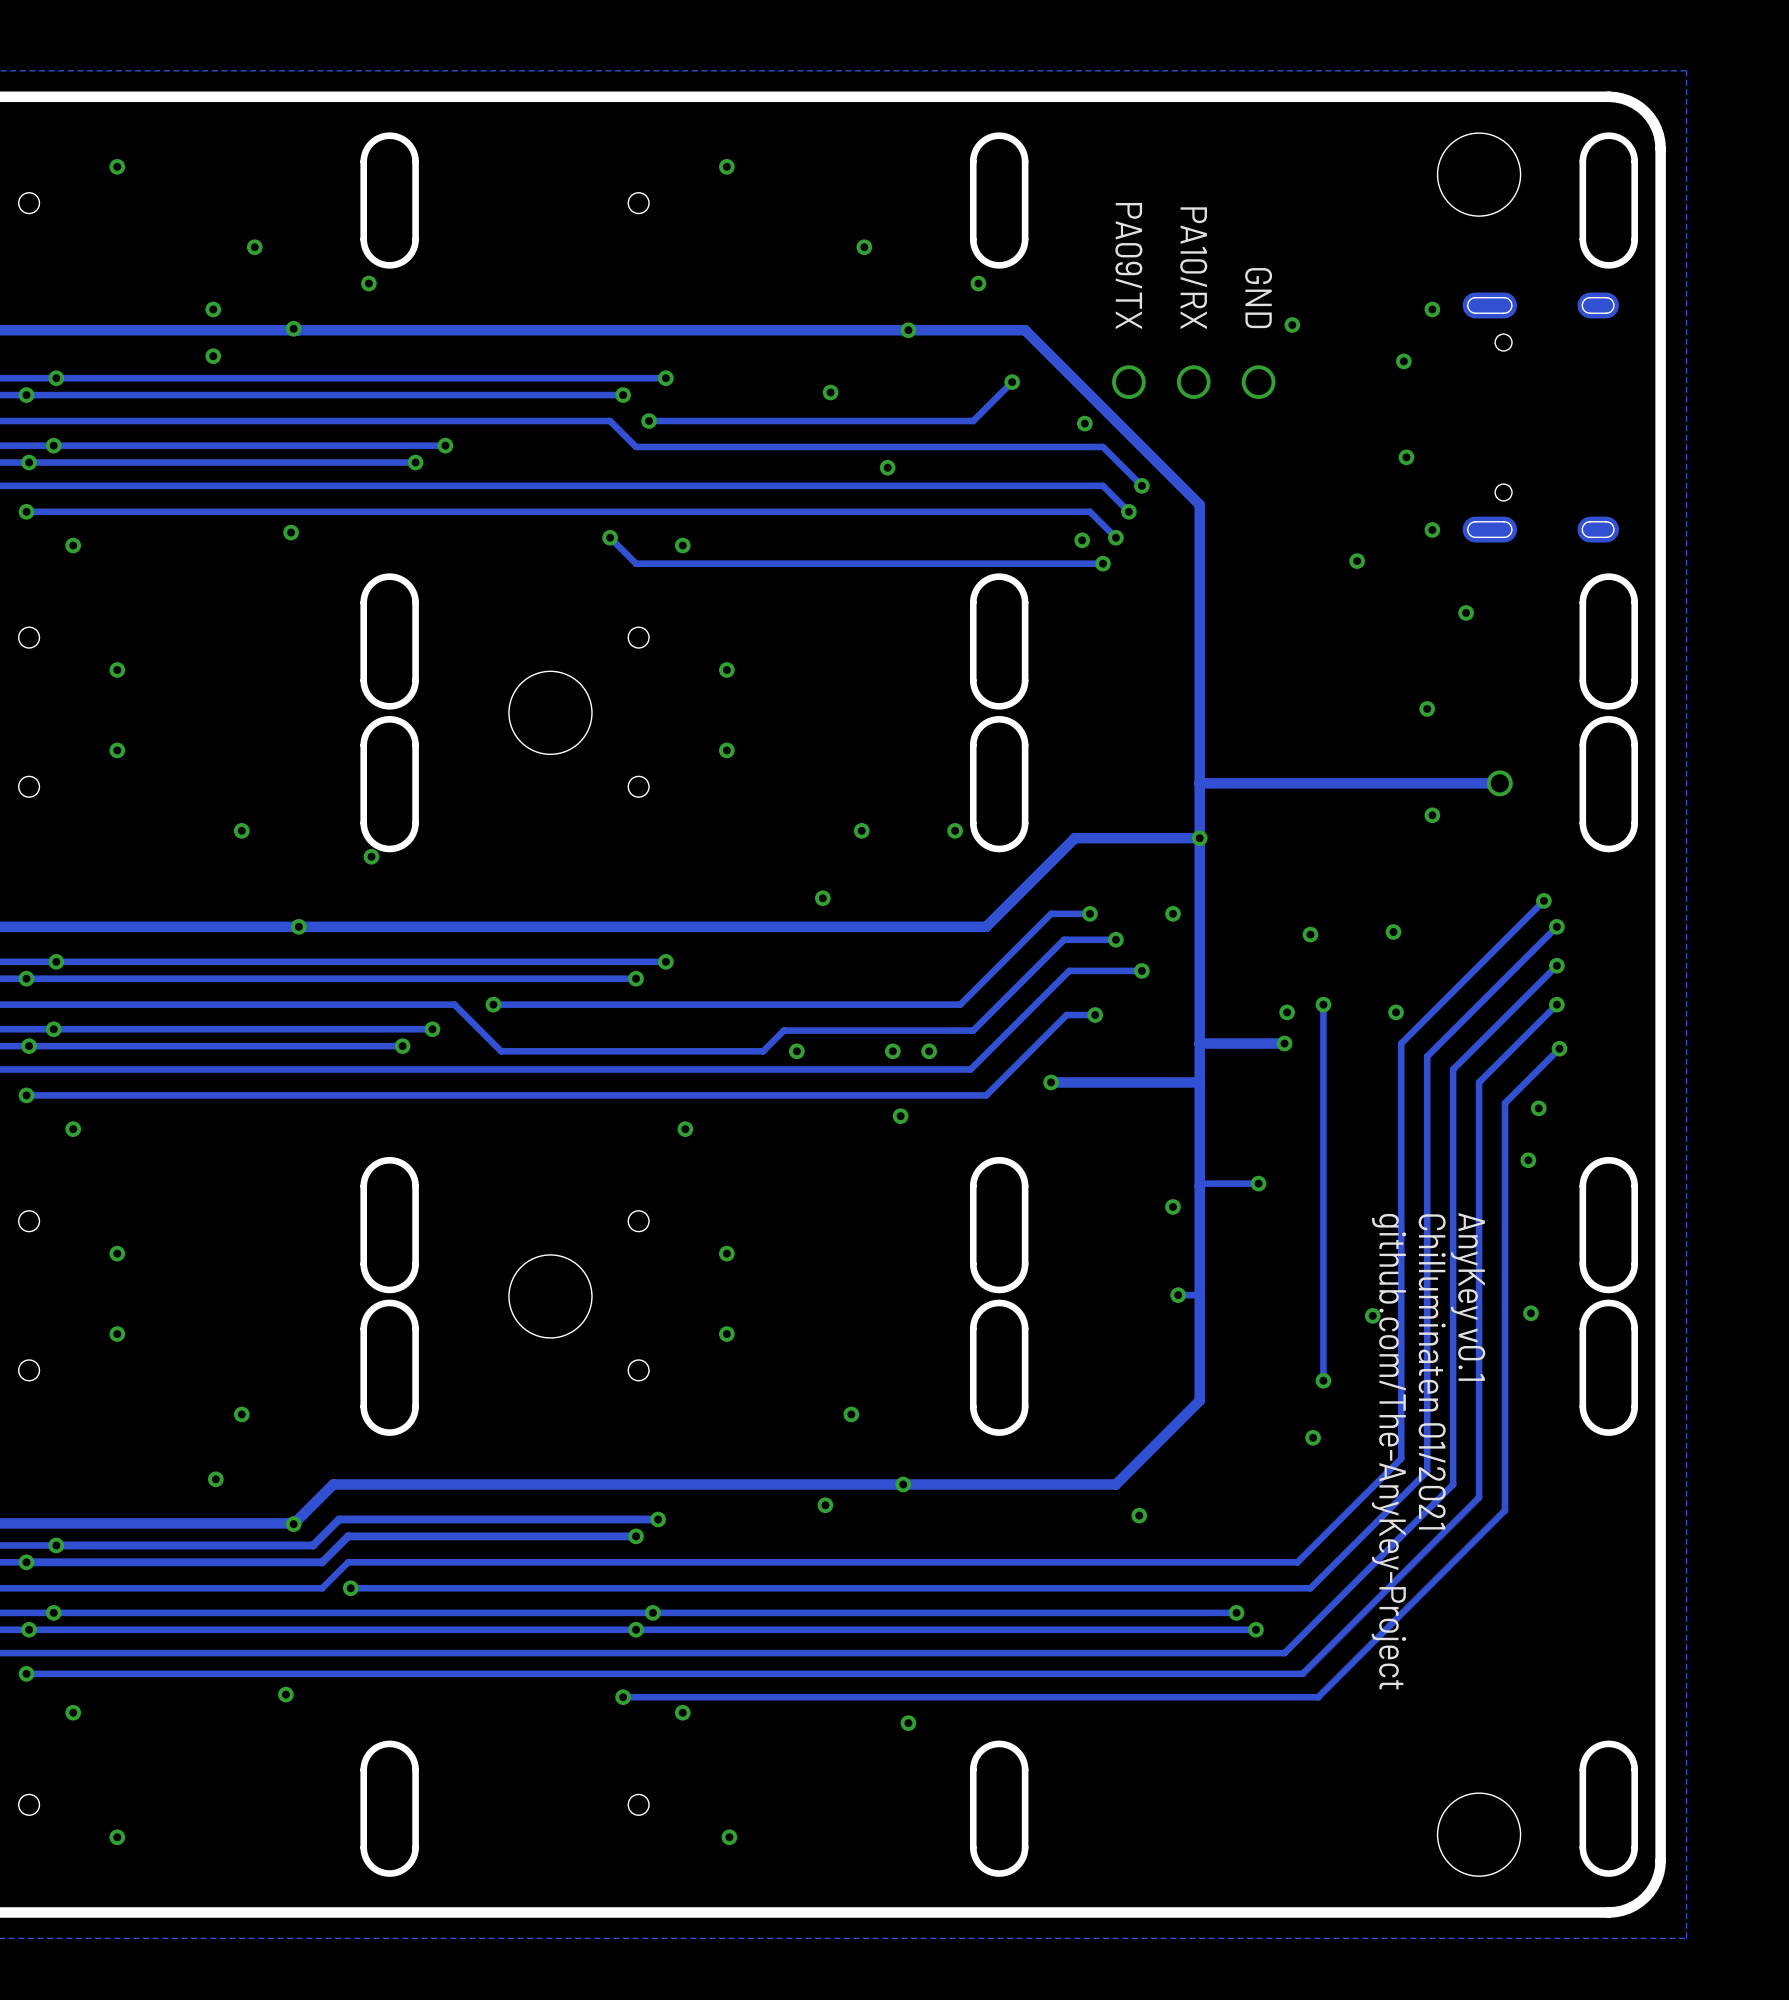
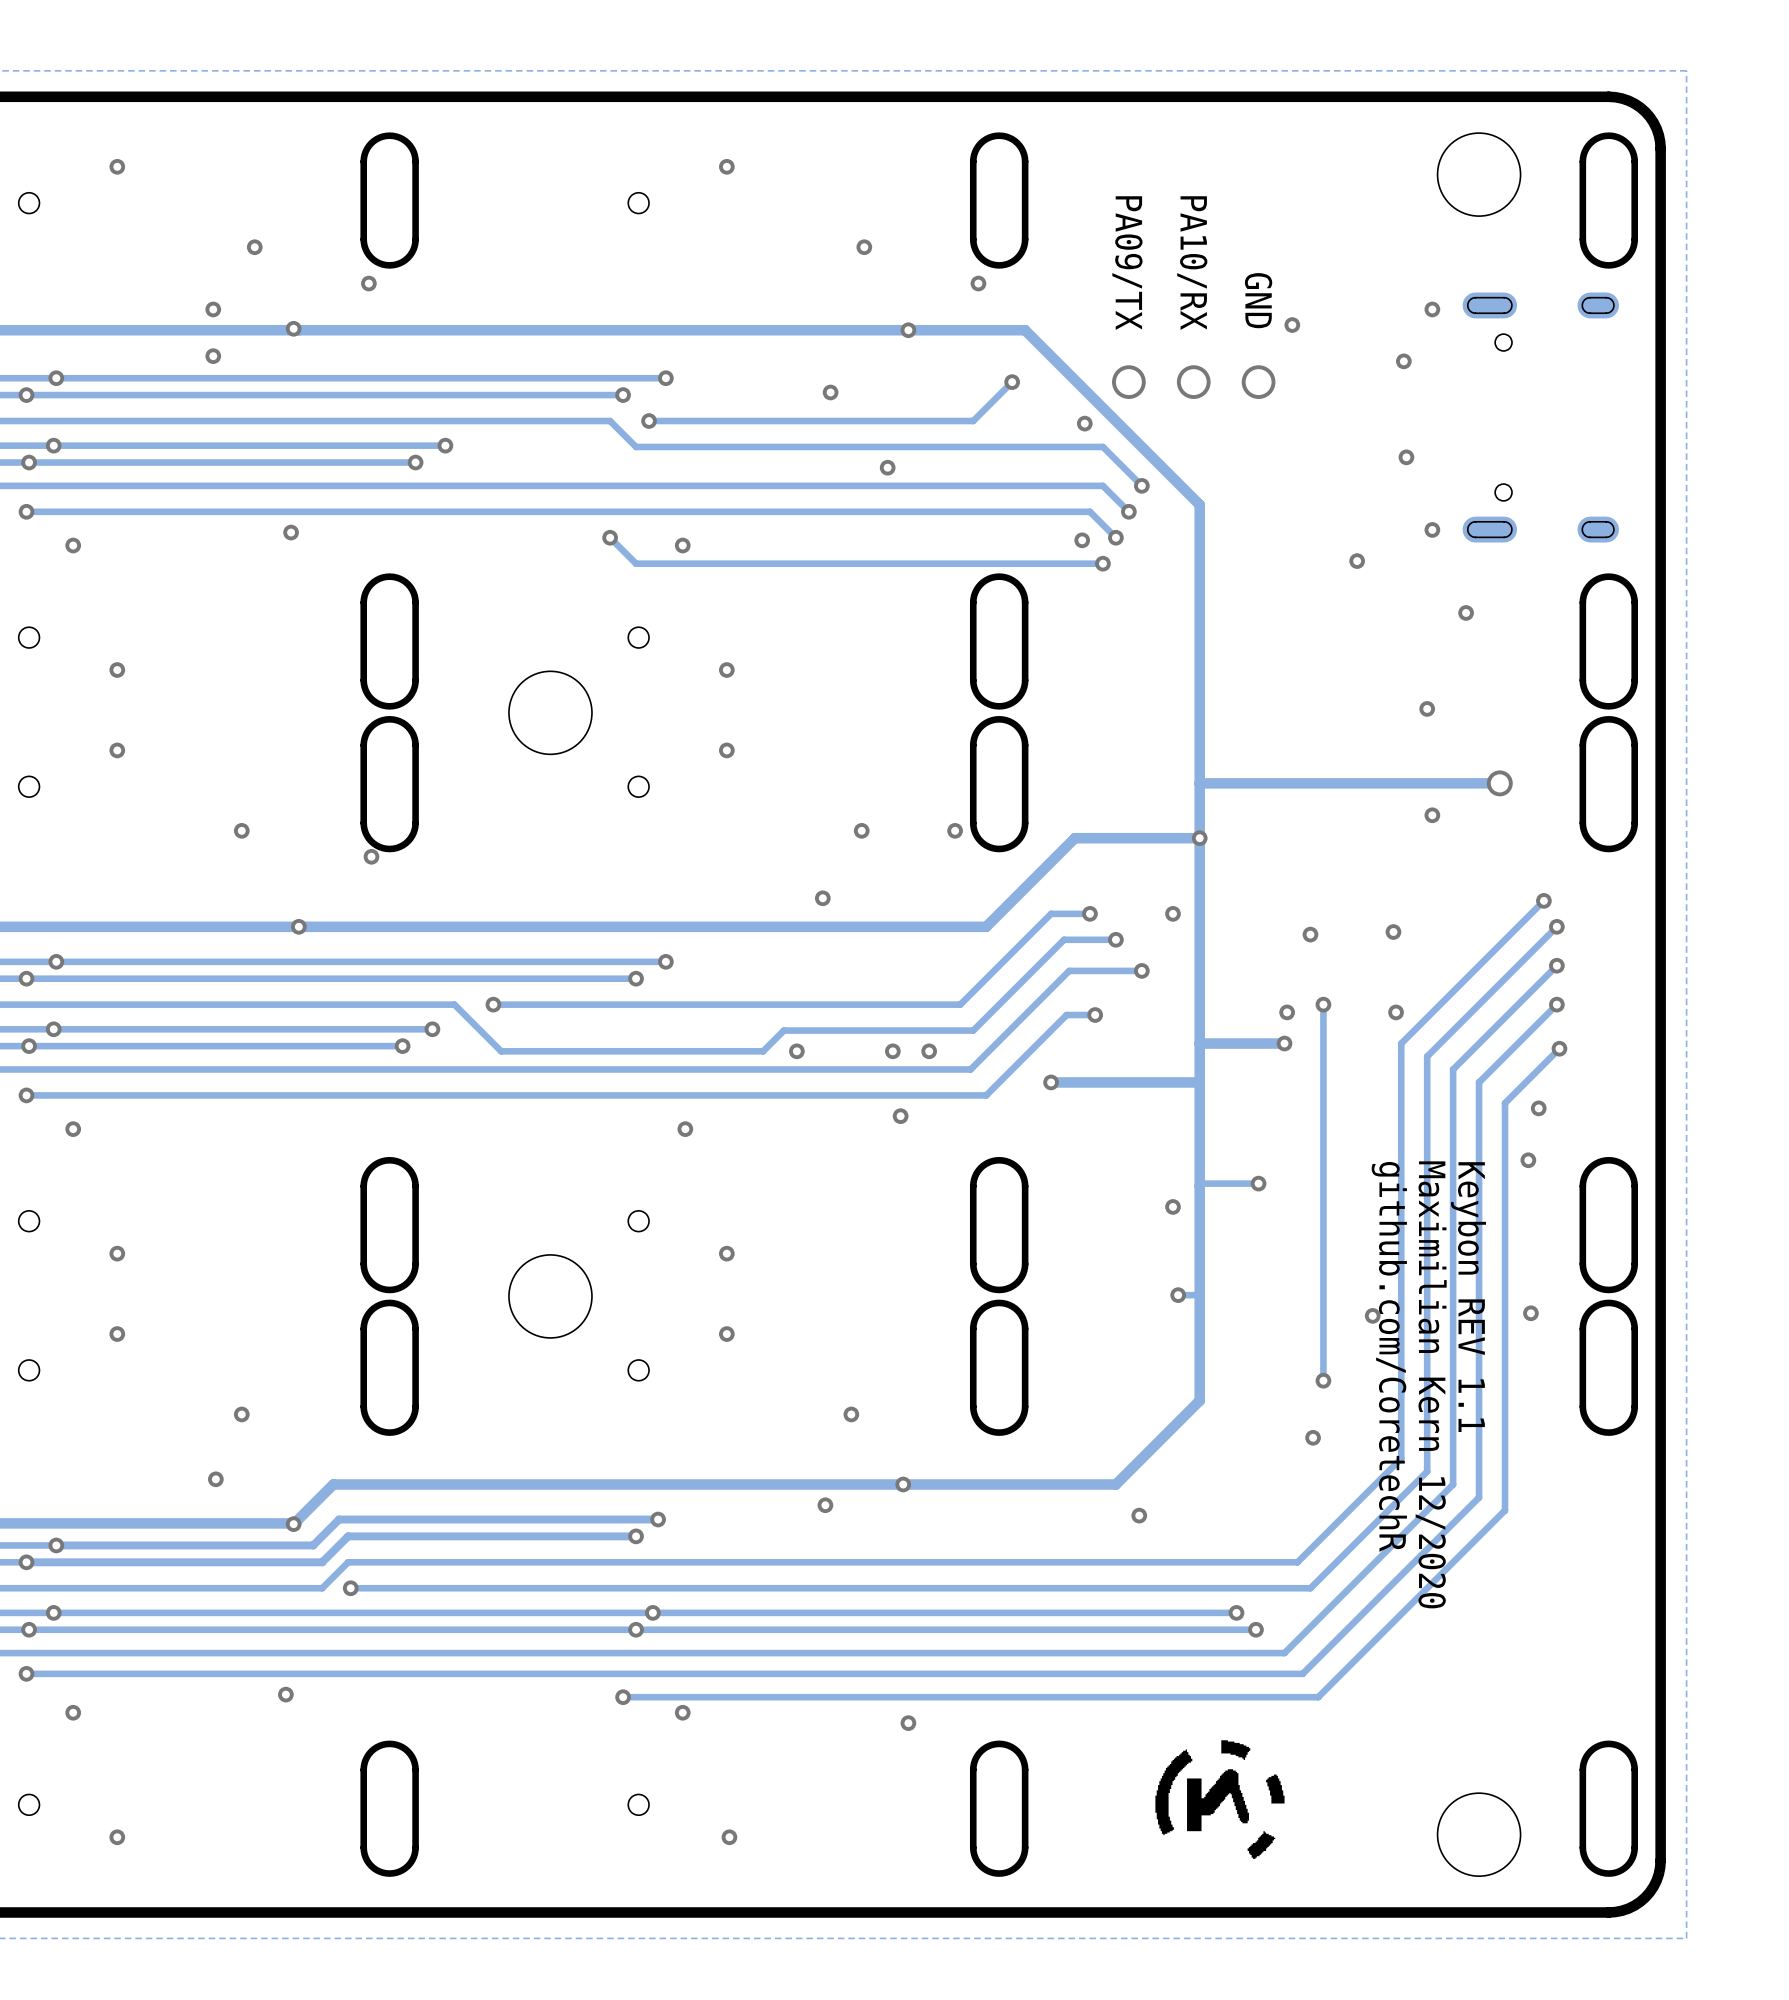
text: none -> Keybon REV 1.1 (1468, 1297)
text: AnyKey v0.1 (1468, 1296) -> none
text: none -> github.com/CoretechR (1389, 1356)
text: none -> Maximilian Kern 12/2020 (1431, 1384)
text: Chilluminaten 01/2021 (1432, 1371) -> none
text: github.com/The-AnyKey-Project (1388, 1451) -> none
drawing: none -> [1155, 1740, 1285, 1859]

